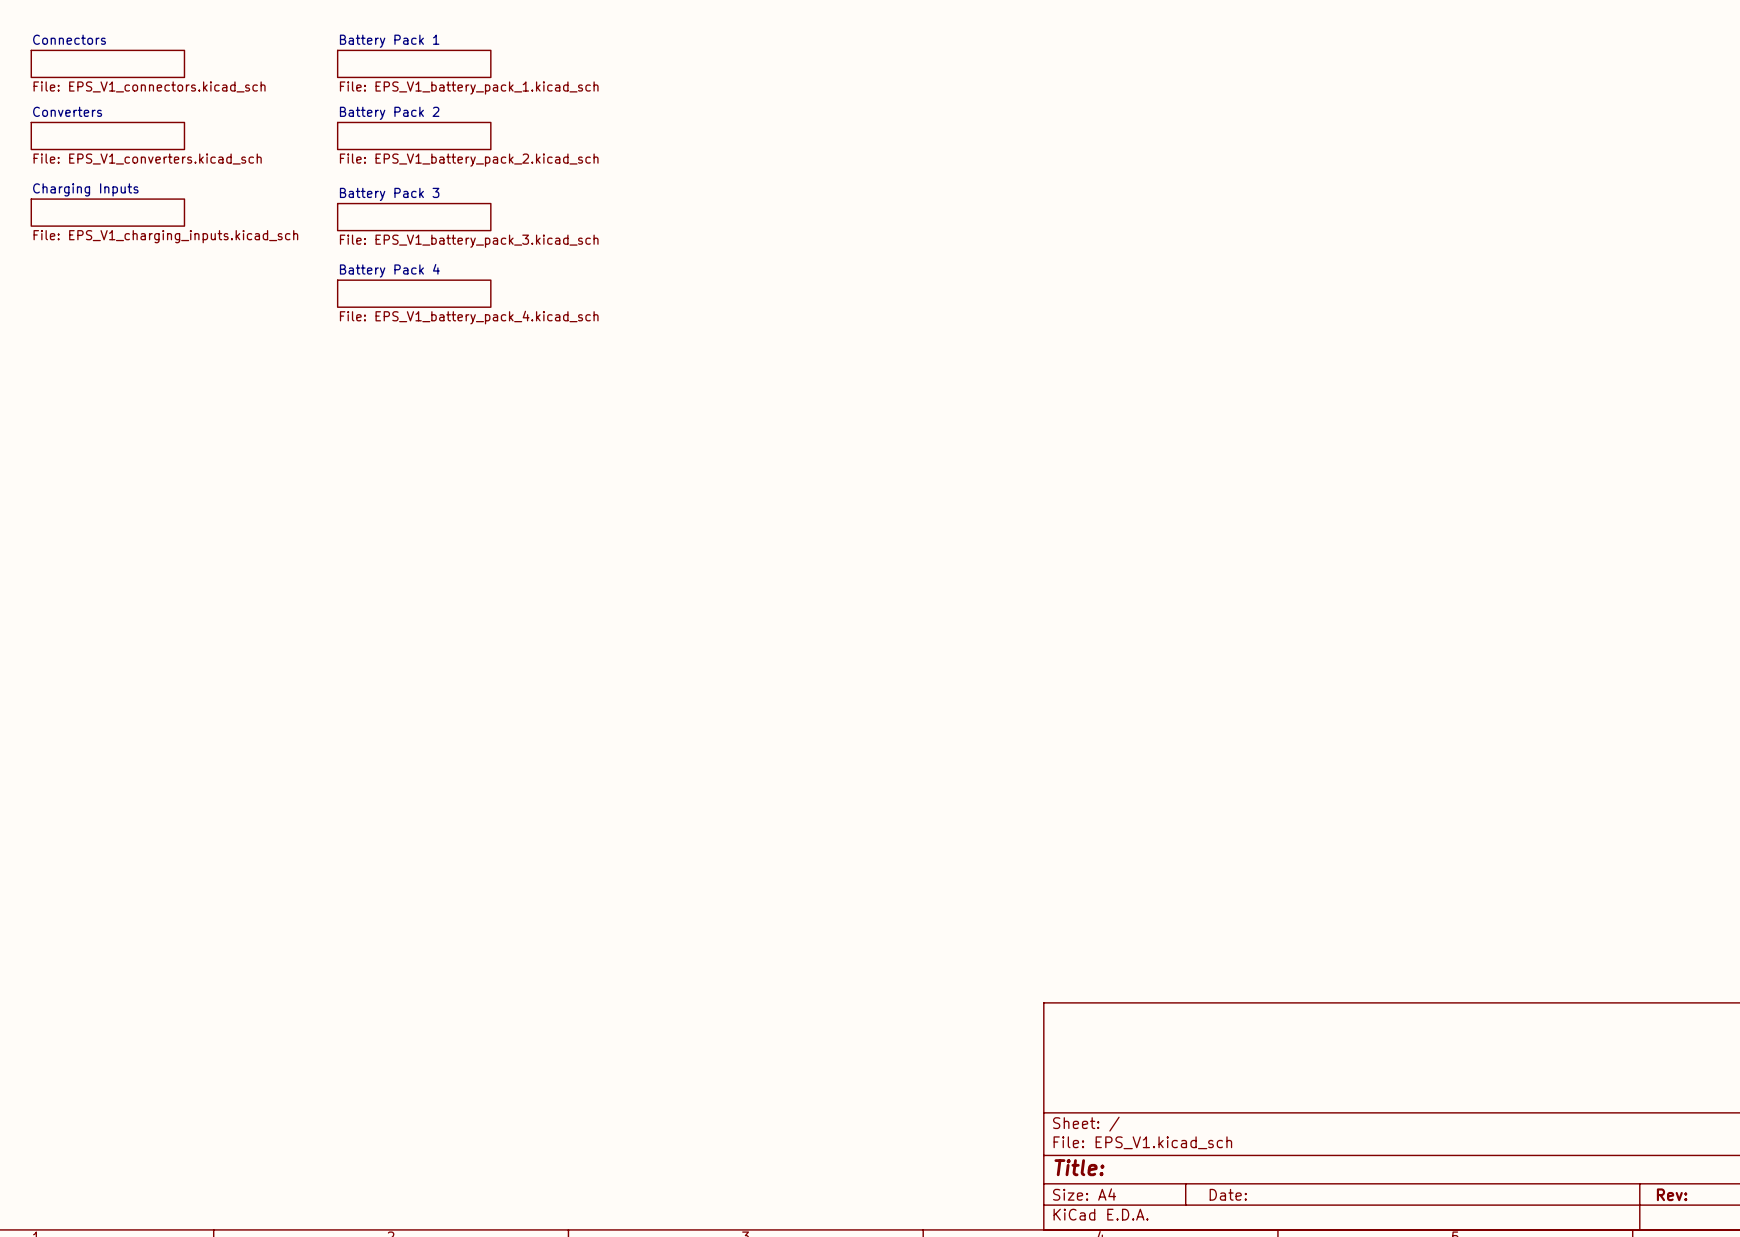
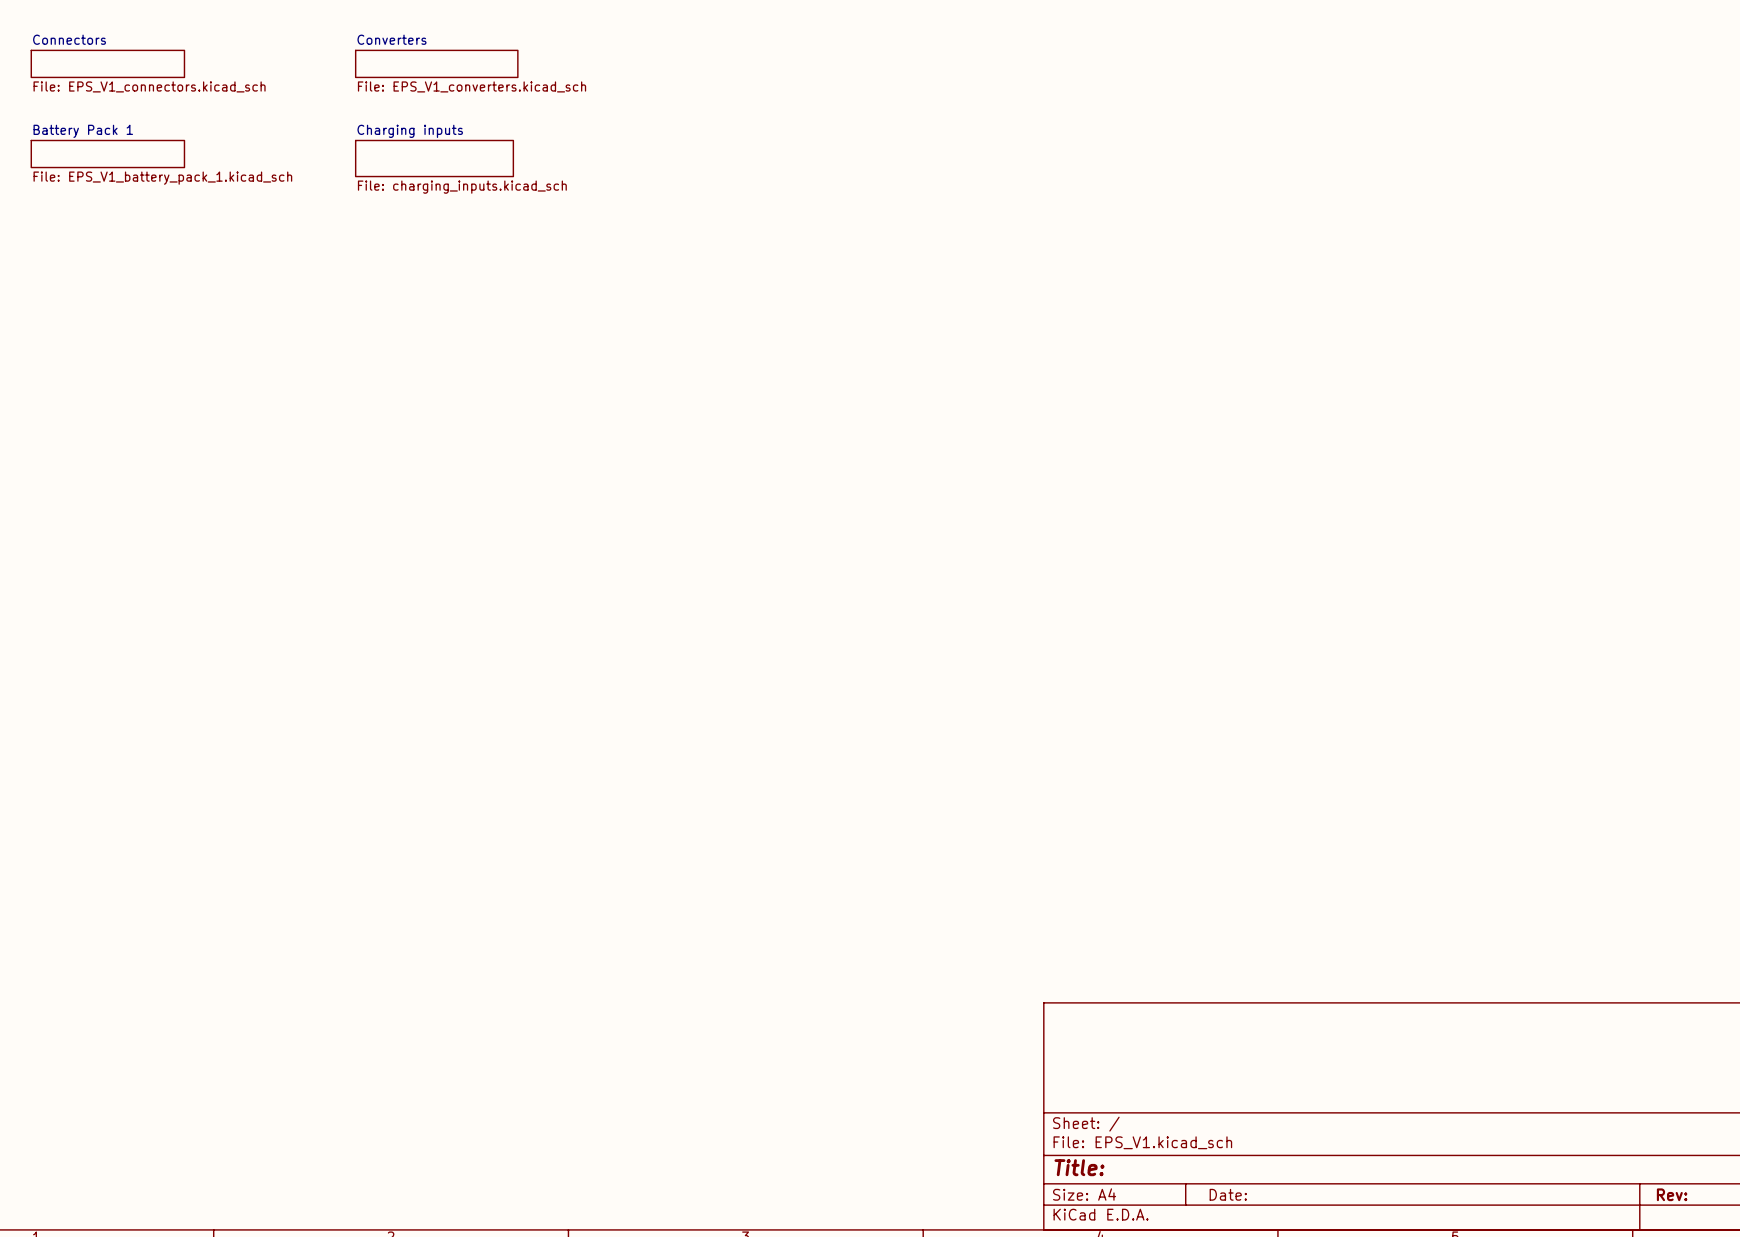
sheet Battery Pack 1 position: (414, 63) -> (107, 154)
sheet Converters: none -> File: EPS_V1_converters.kicad_sch (436, 63)
sheet Converters: File: EPS_V1_converters.kicad_sch (107, 135) -> none
sheet Battery Pack 2: File: EPS_V1_battery_pack_2.kicad_sch (414, 135) -> none
sheet Charging inputs: none -> File: charging_inputs.kicad_sch (434, 158)
sheet Charging Inputs: File: EPS_V1_charging_inputs.kicad_sch (107, 212) -> none
sheet Battery Pack 3: File: EPS_V1_battery_pack_3.kicad_sch (414, 217) -> none
sheet Battery Pack 4: File: EPS_V1_battery_pack_4.kicad_sch (414, 293) -> none

